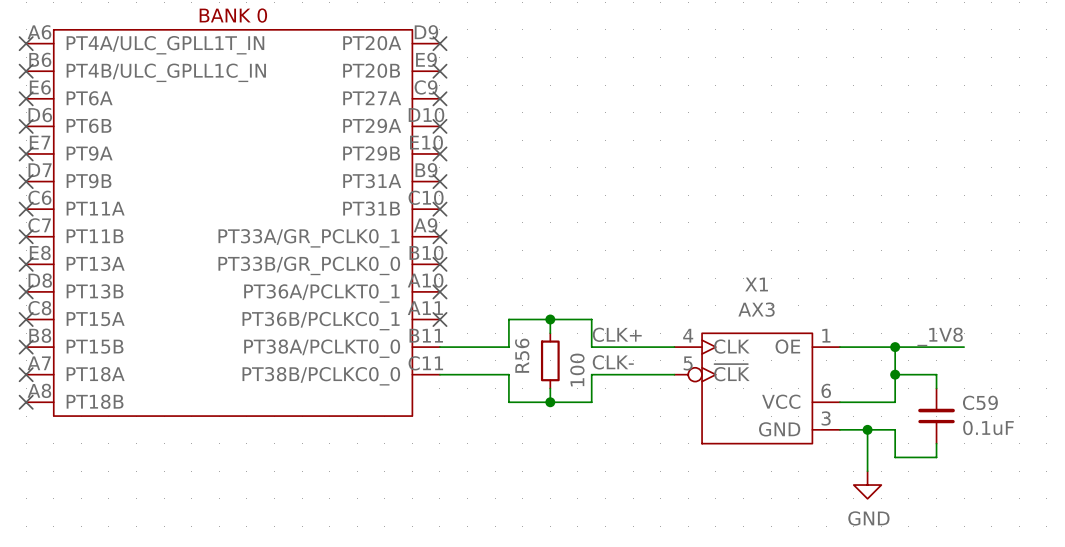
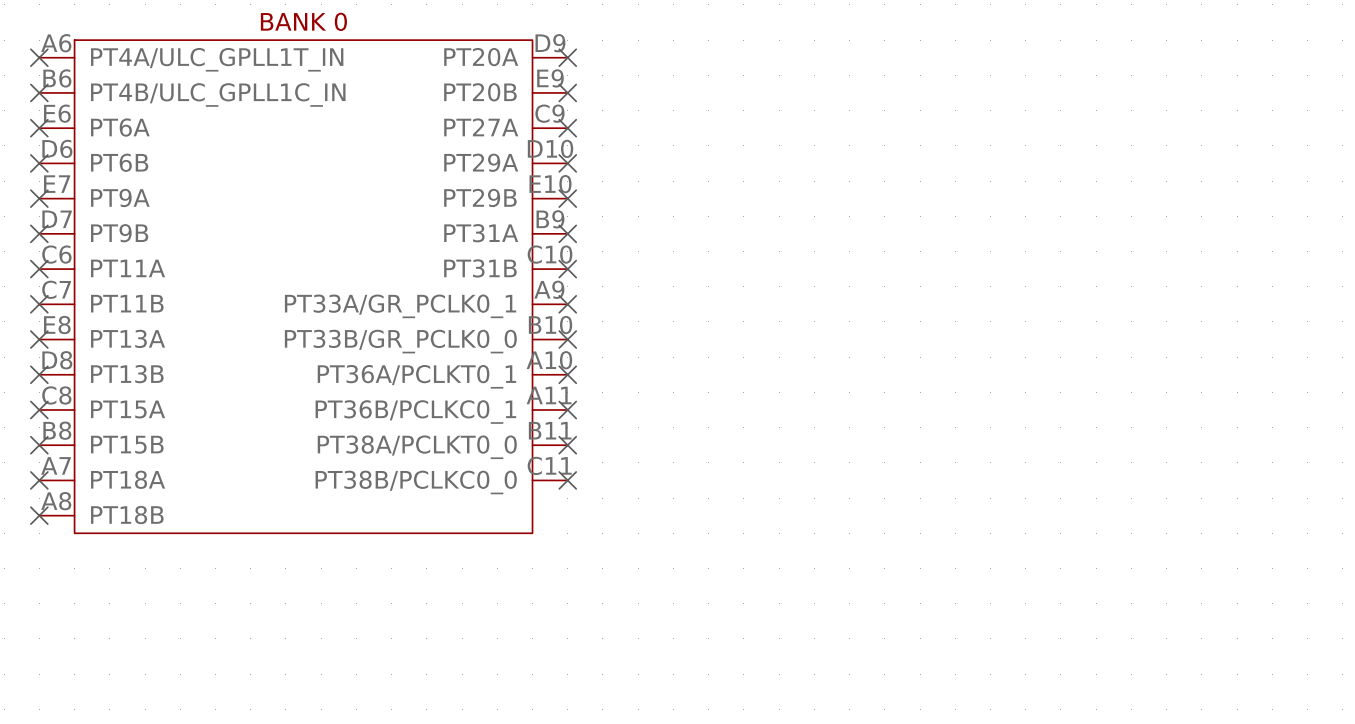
wire: (550, 319) (550, 333) -> none
junction: (550, 319) -> none
label: CLK+ (617, 334) -> none
label: _1V8 (940, 336) -> none
wire: (439, 347) (508, 347) (508, 319) (591, 319) (591, 347) (674, 347) -> none
no-connect mark: none -> (567, 445)
wire: (839, 347) (964, 347) -> none
wire: (895, 347) (895, 402) (839, 402) -> none
junction: (895, 347) -> none
R56: 100 (550, 360) -> none
label: CLK- (613, 362) -> none
wire: (439, 374) (508, 374) (508, 402) (591, 402) (591, 374) (674, 374) -> none
no-connect mark: none -> (567, 480)
wire: (895, 374) (936, 374) (936, 388) -> none
junction: (895, 374) -> none
wire: (550, 388) (550, 402) -> none
X1: AX3 (757, 388) -> none
junction: (550, 402) -> none
C59: 0.1uF (936, 416) -> none
wire: (839, 429) (895, 429) (895, 457) (936, 457) (936, 443) -> none
wire: (867, 429) (867, 471) -> none
junction: (867, 429) -> none
power symbol: GND (867, 485) -> none

